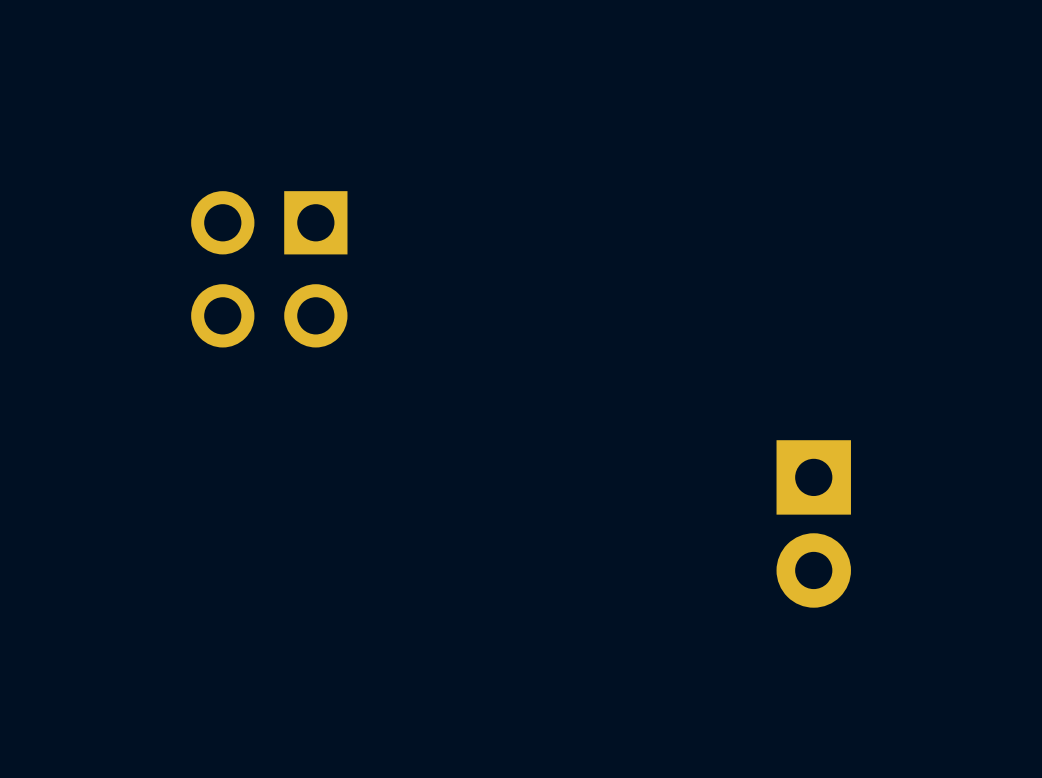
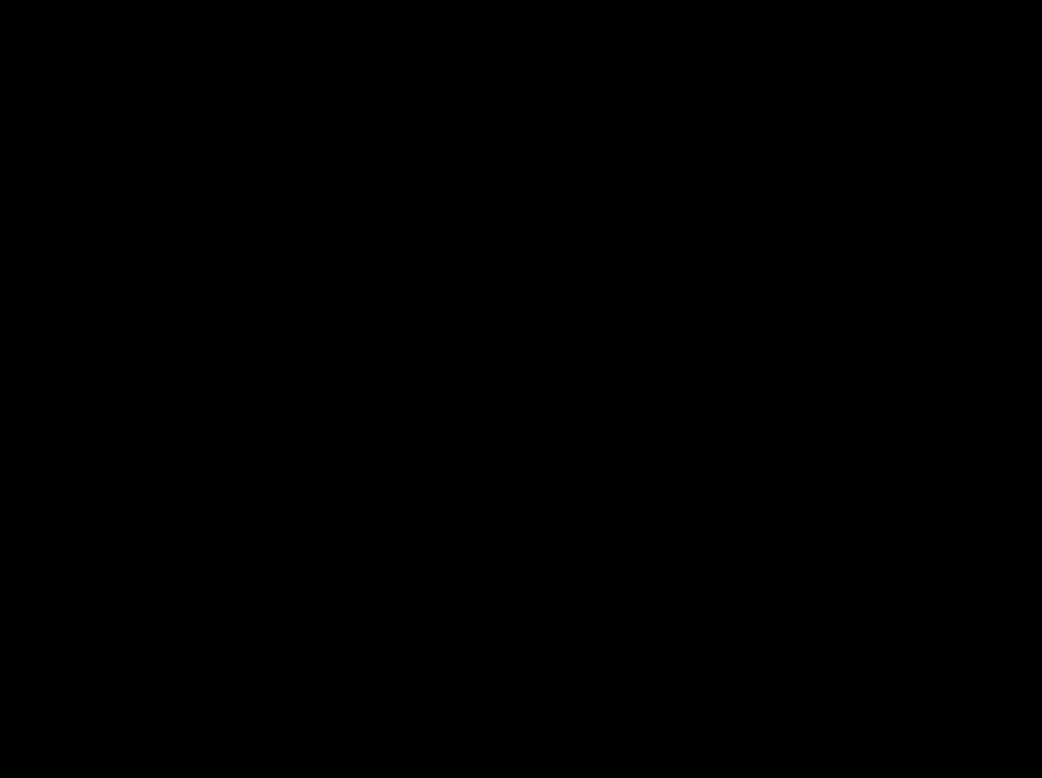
part: (269, 269) -> none
part: (813, 523) -> none

